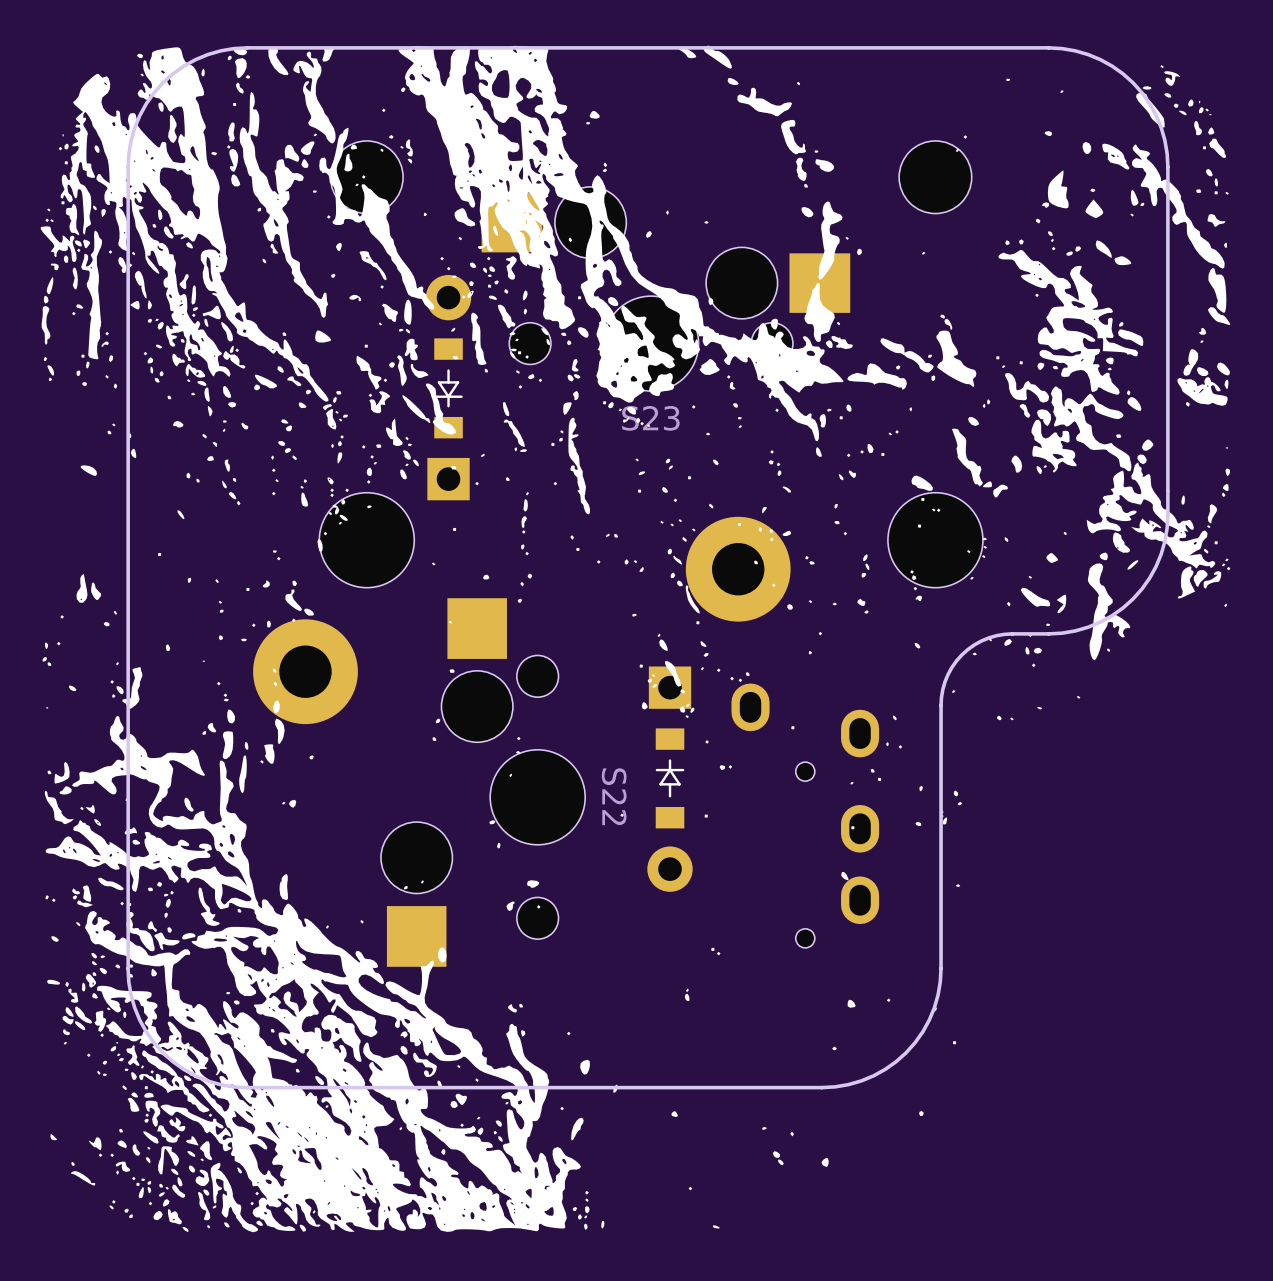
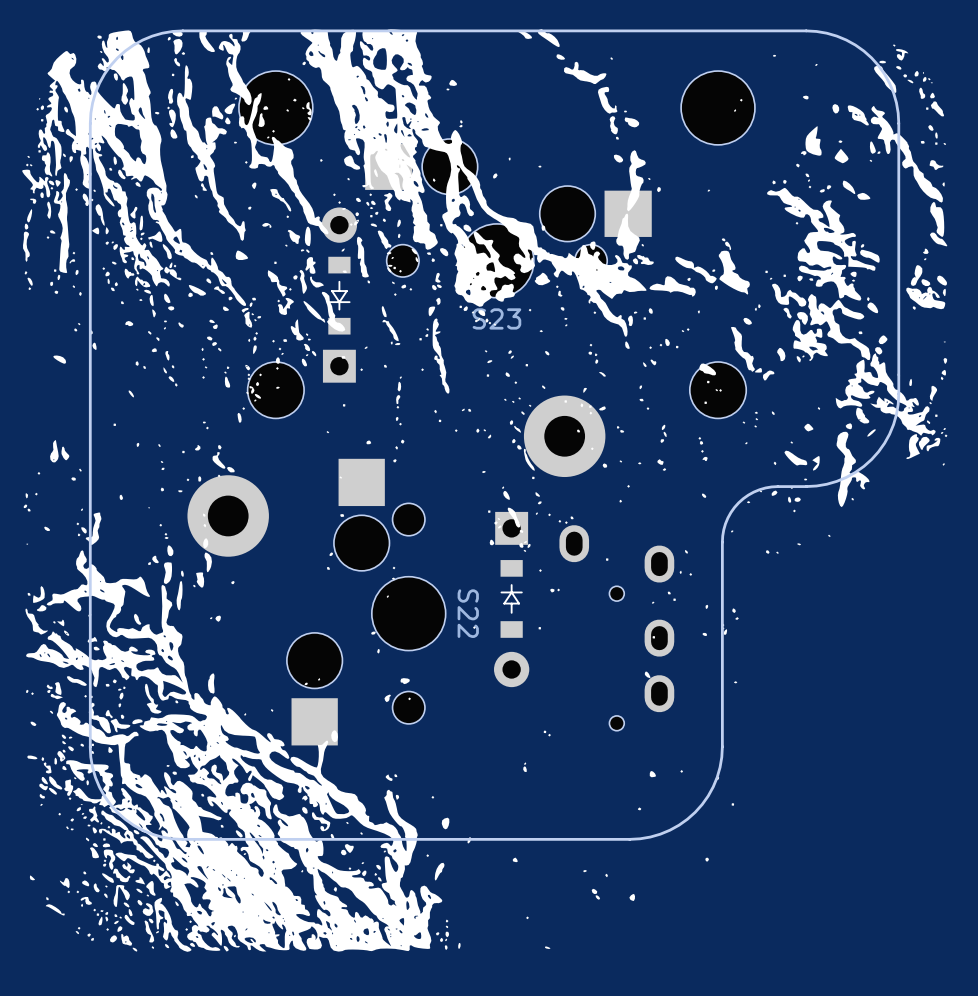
S23 footprint: [319, 140, 983, 588] -> [238, 71, 755, 419]

